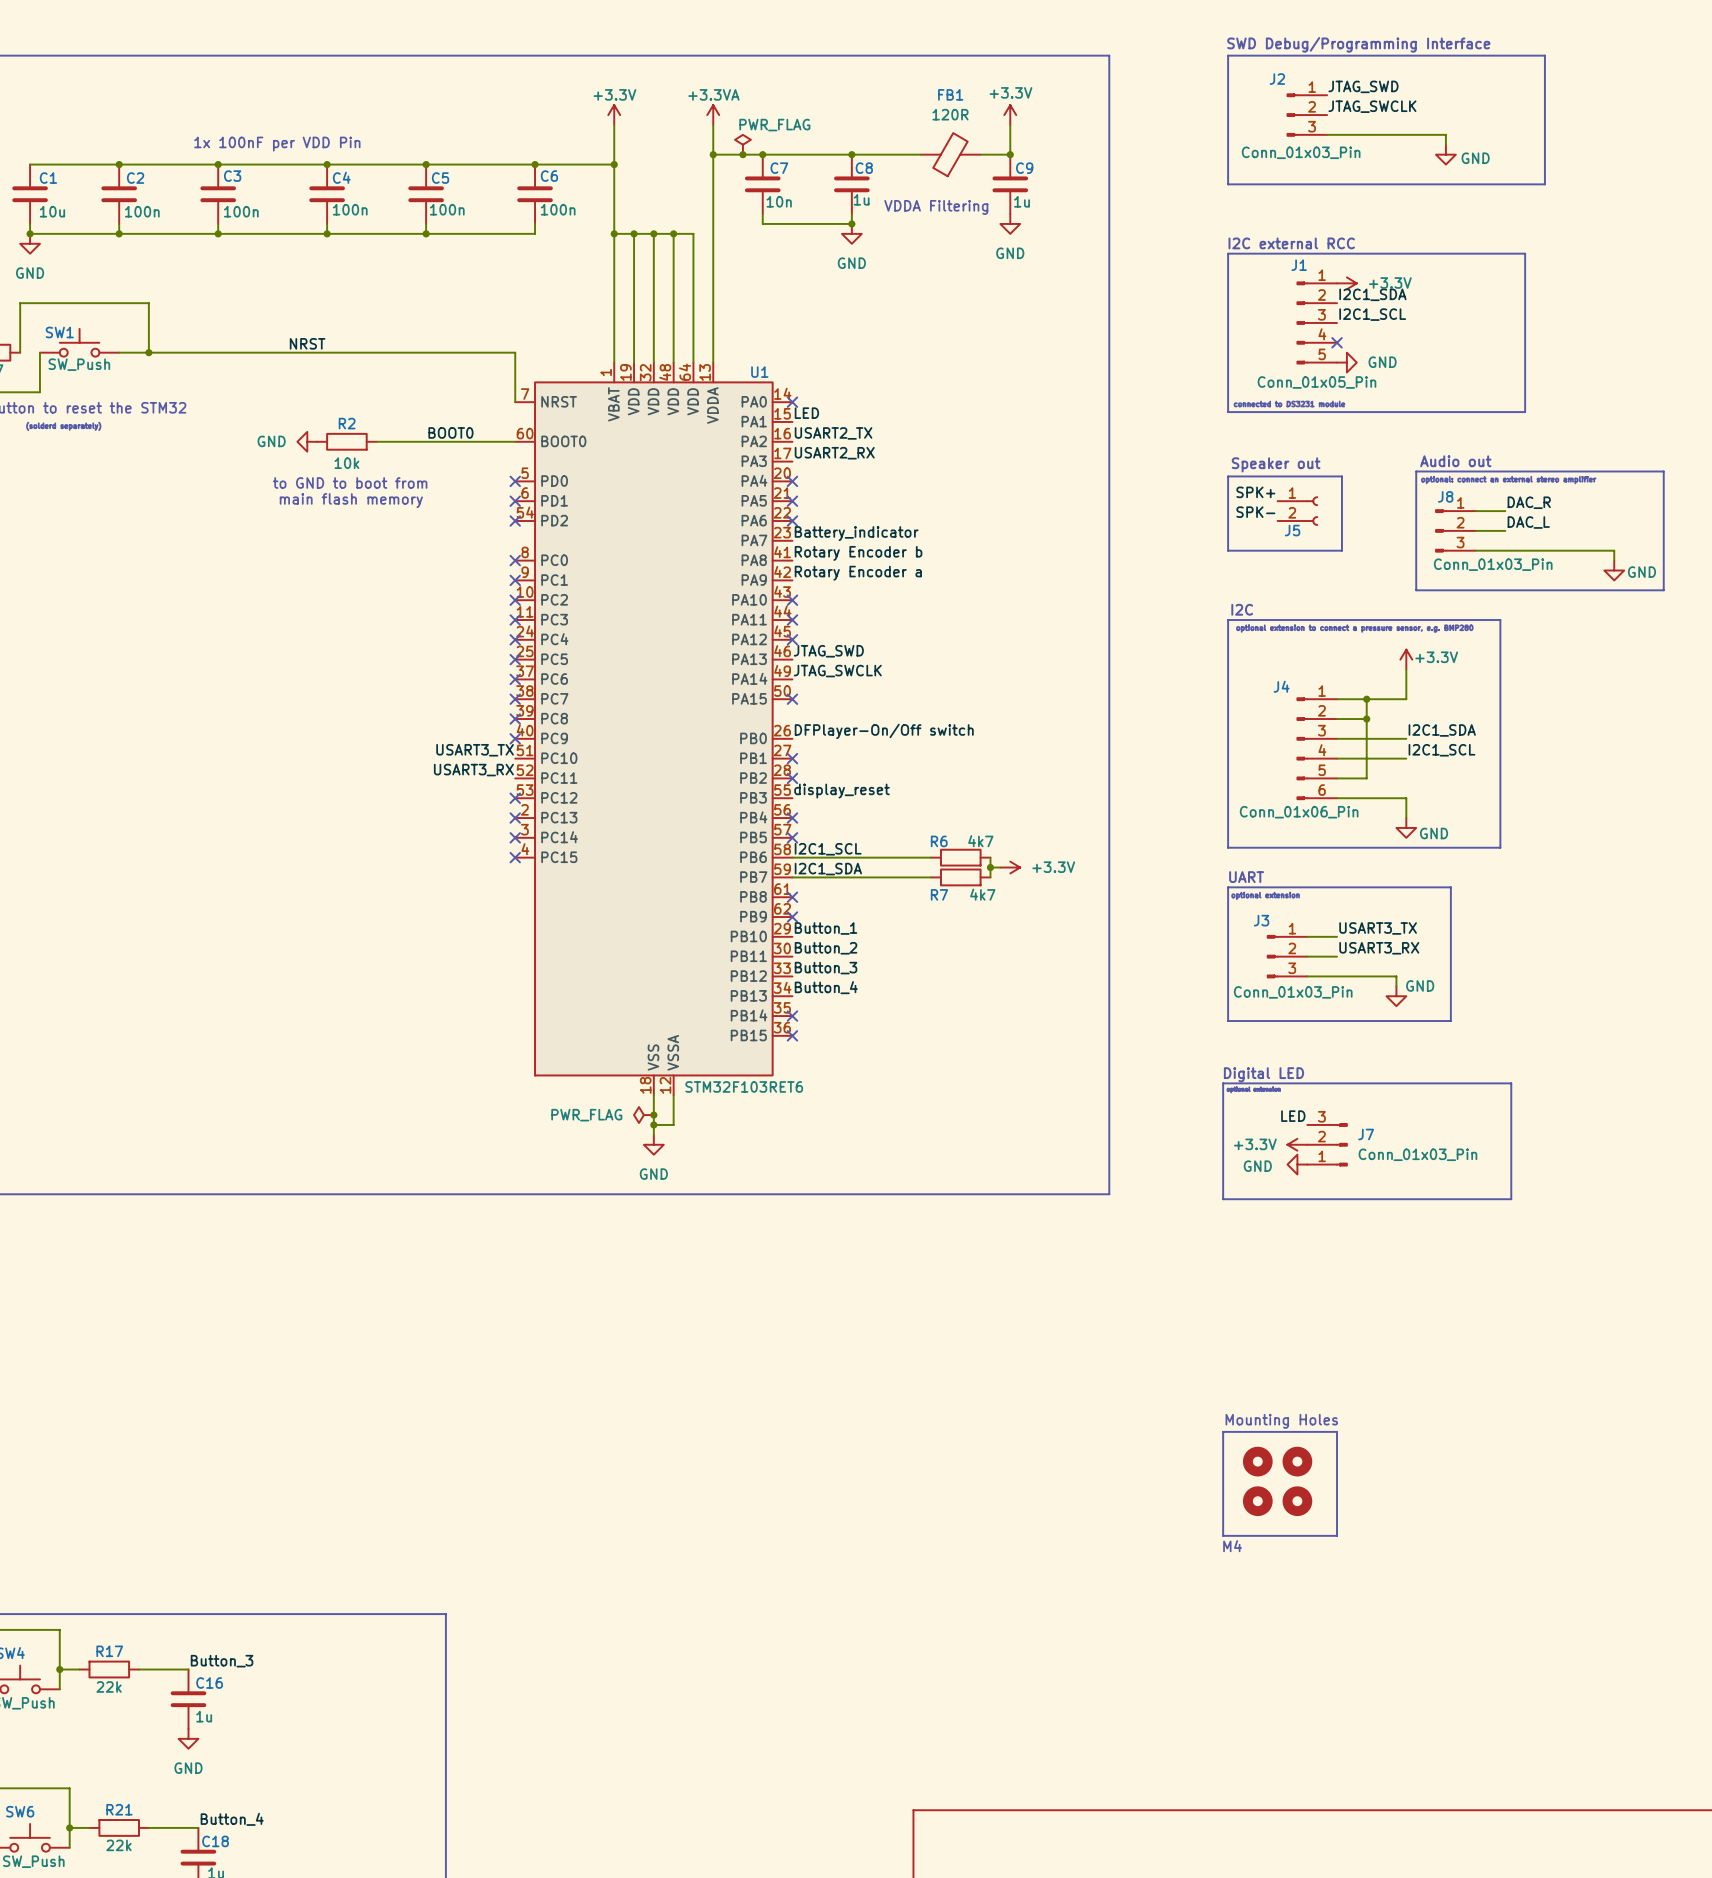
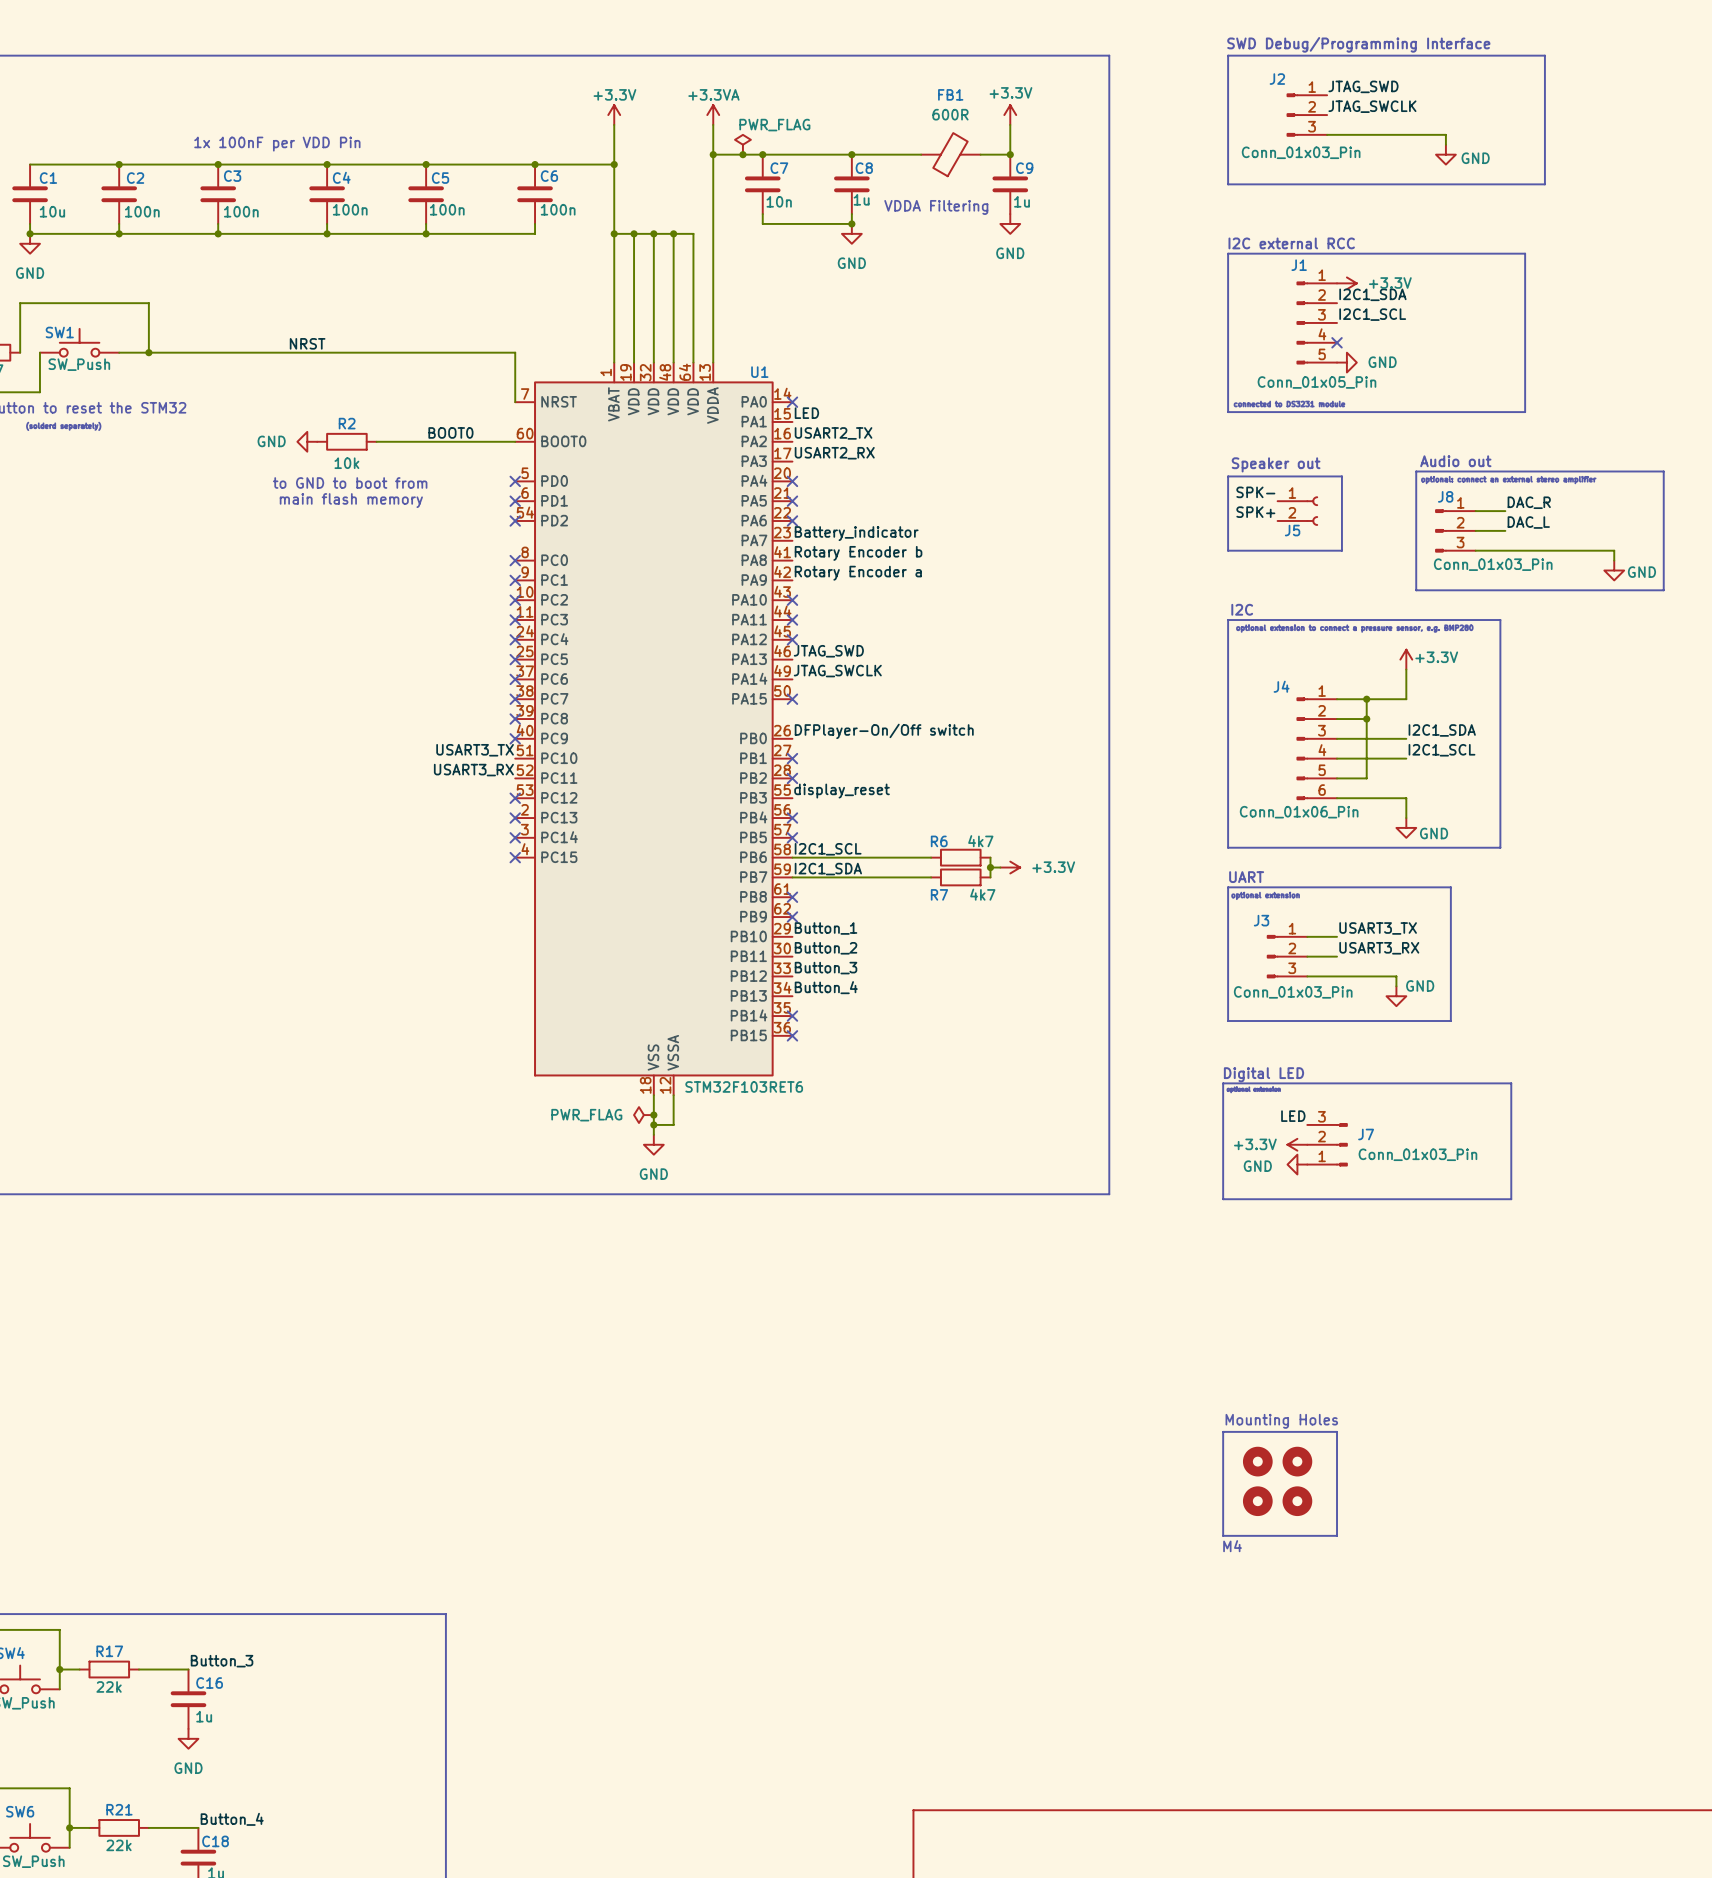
FB1 value: 120R (950, 114) -> 600R (950, 114)
label: SPK+ (1255, 492) -> SPK- (1255, 492)
label: SPK- (1255, 512) -> SPK+ (1255, 512)

